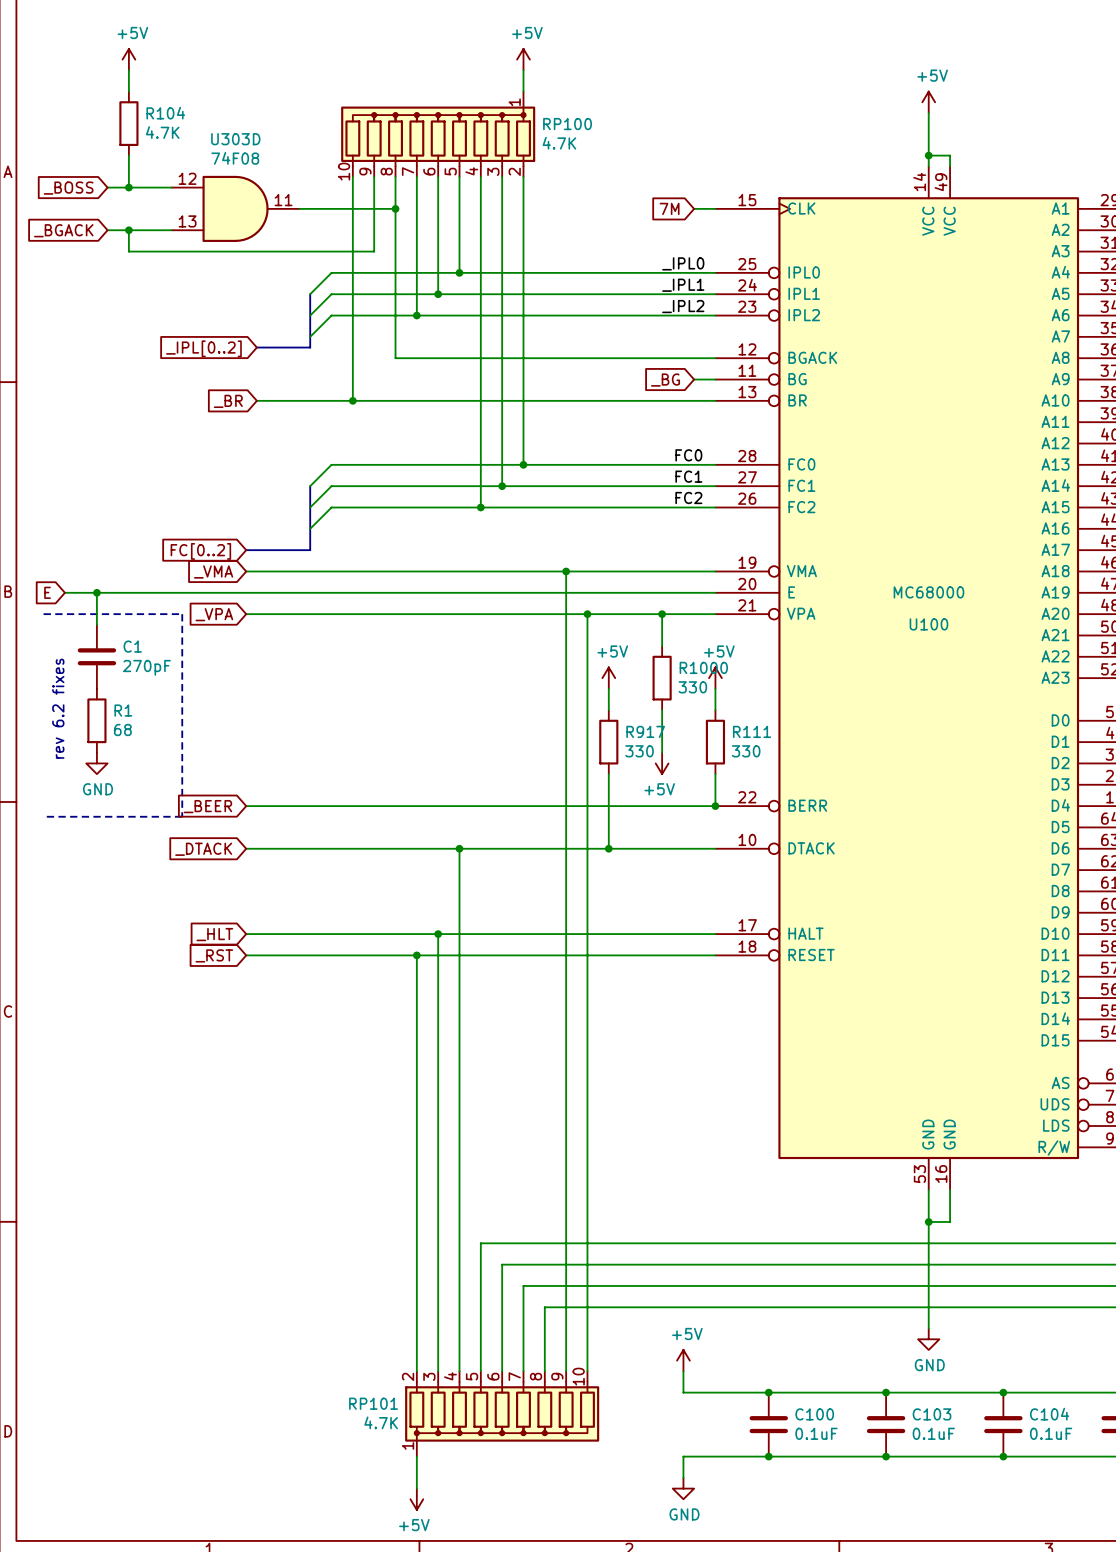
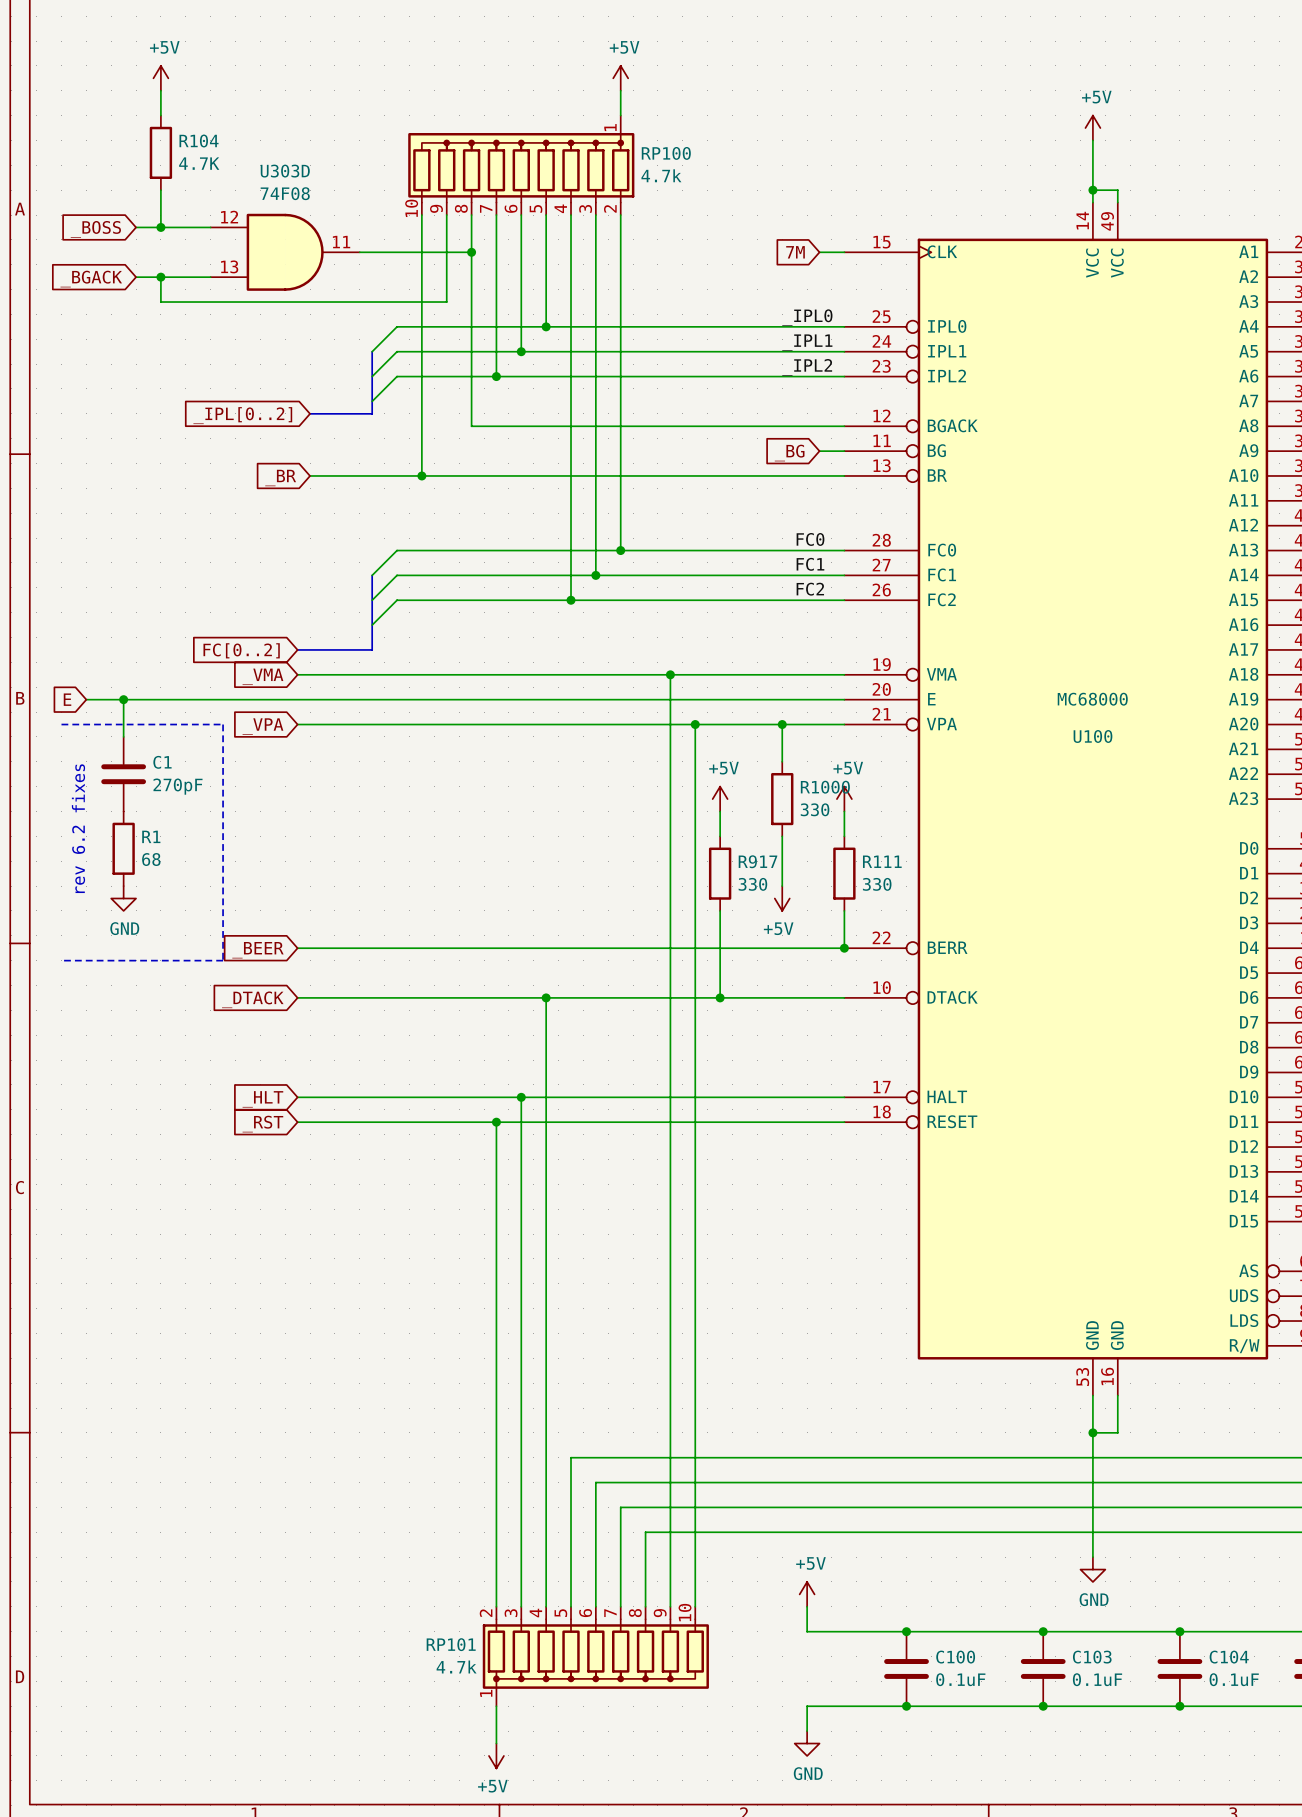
RP100 value: 4.7K (559, 143) -> 4.7k (661, 175)
RP101 value: 4.7K (381, 1422) -> 4.7k (456, 1666)

